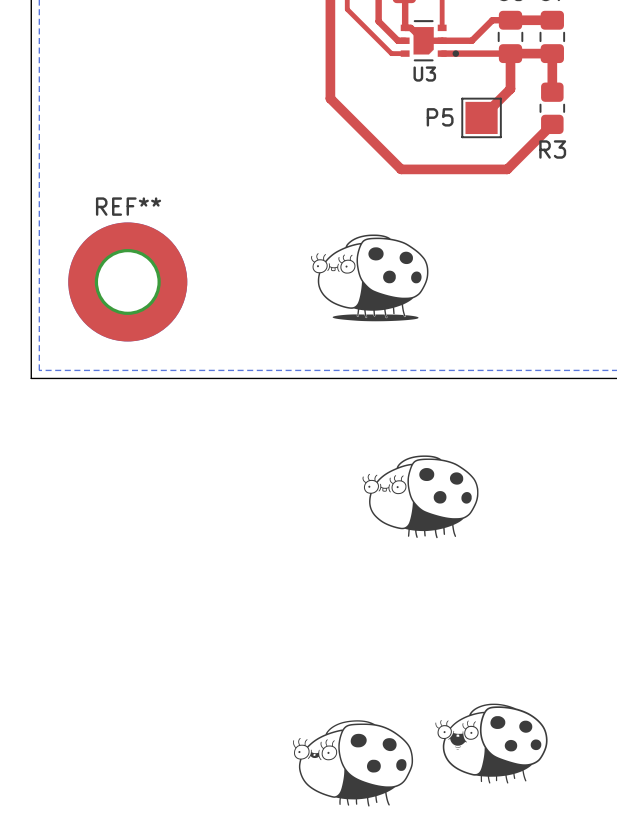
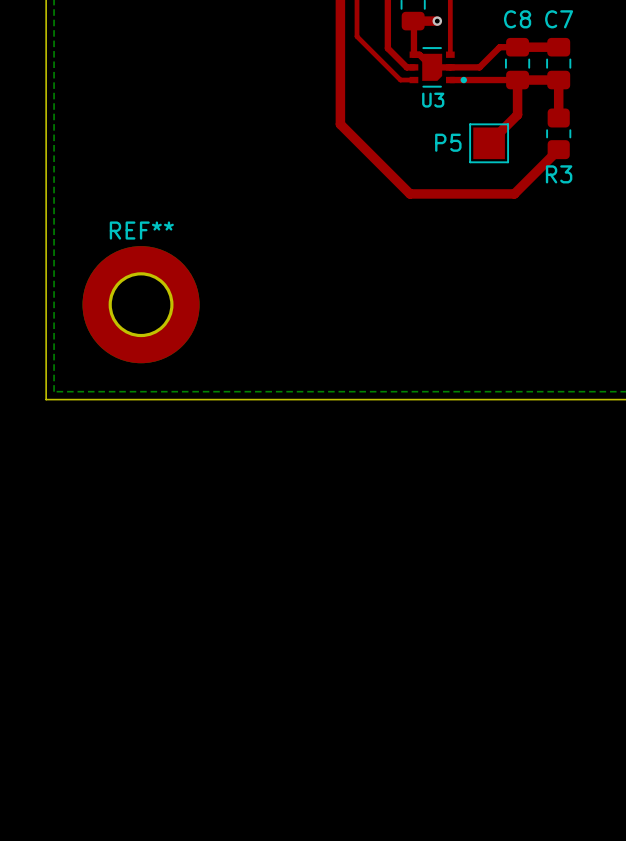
drawing: [311, 234, 429, 322] -> none
drawing: [362, 455, 479, 539] -> none
drawing: [435, 703, 548, 784] -> none
drawing: [293, 720, 414, 807] -> none

